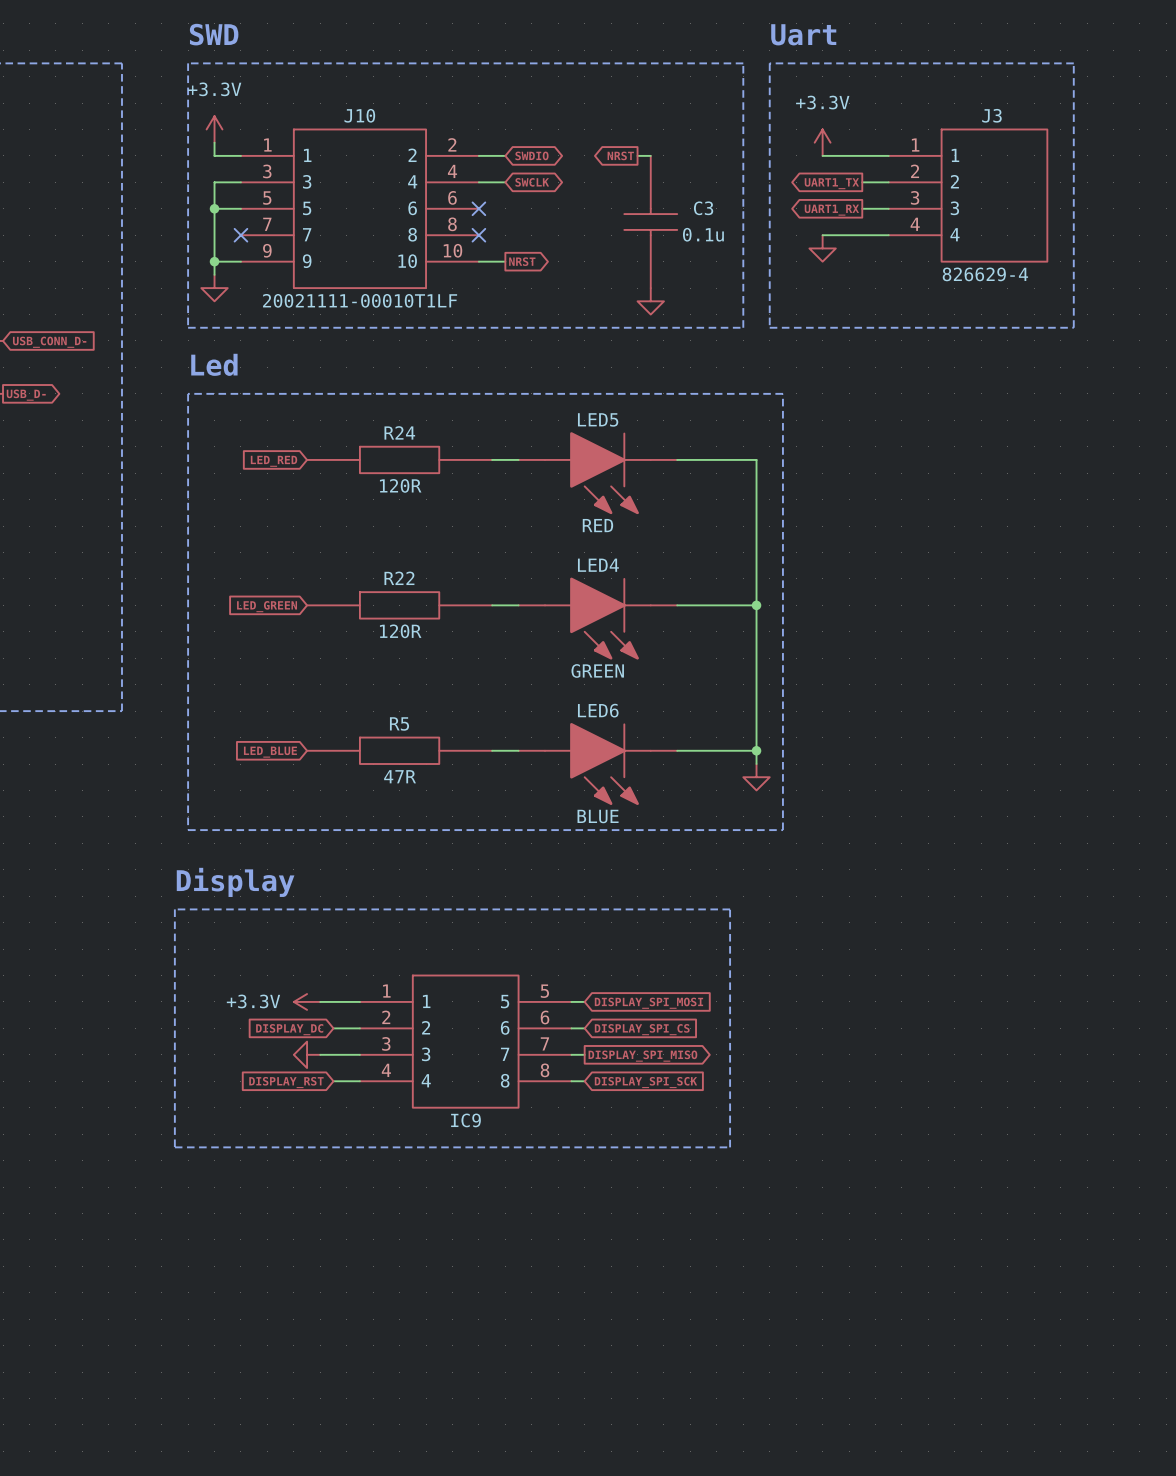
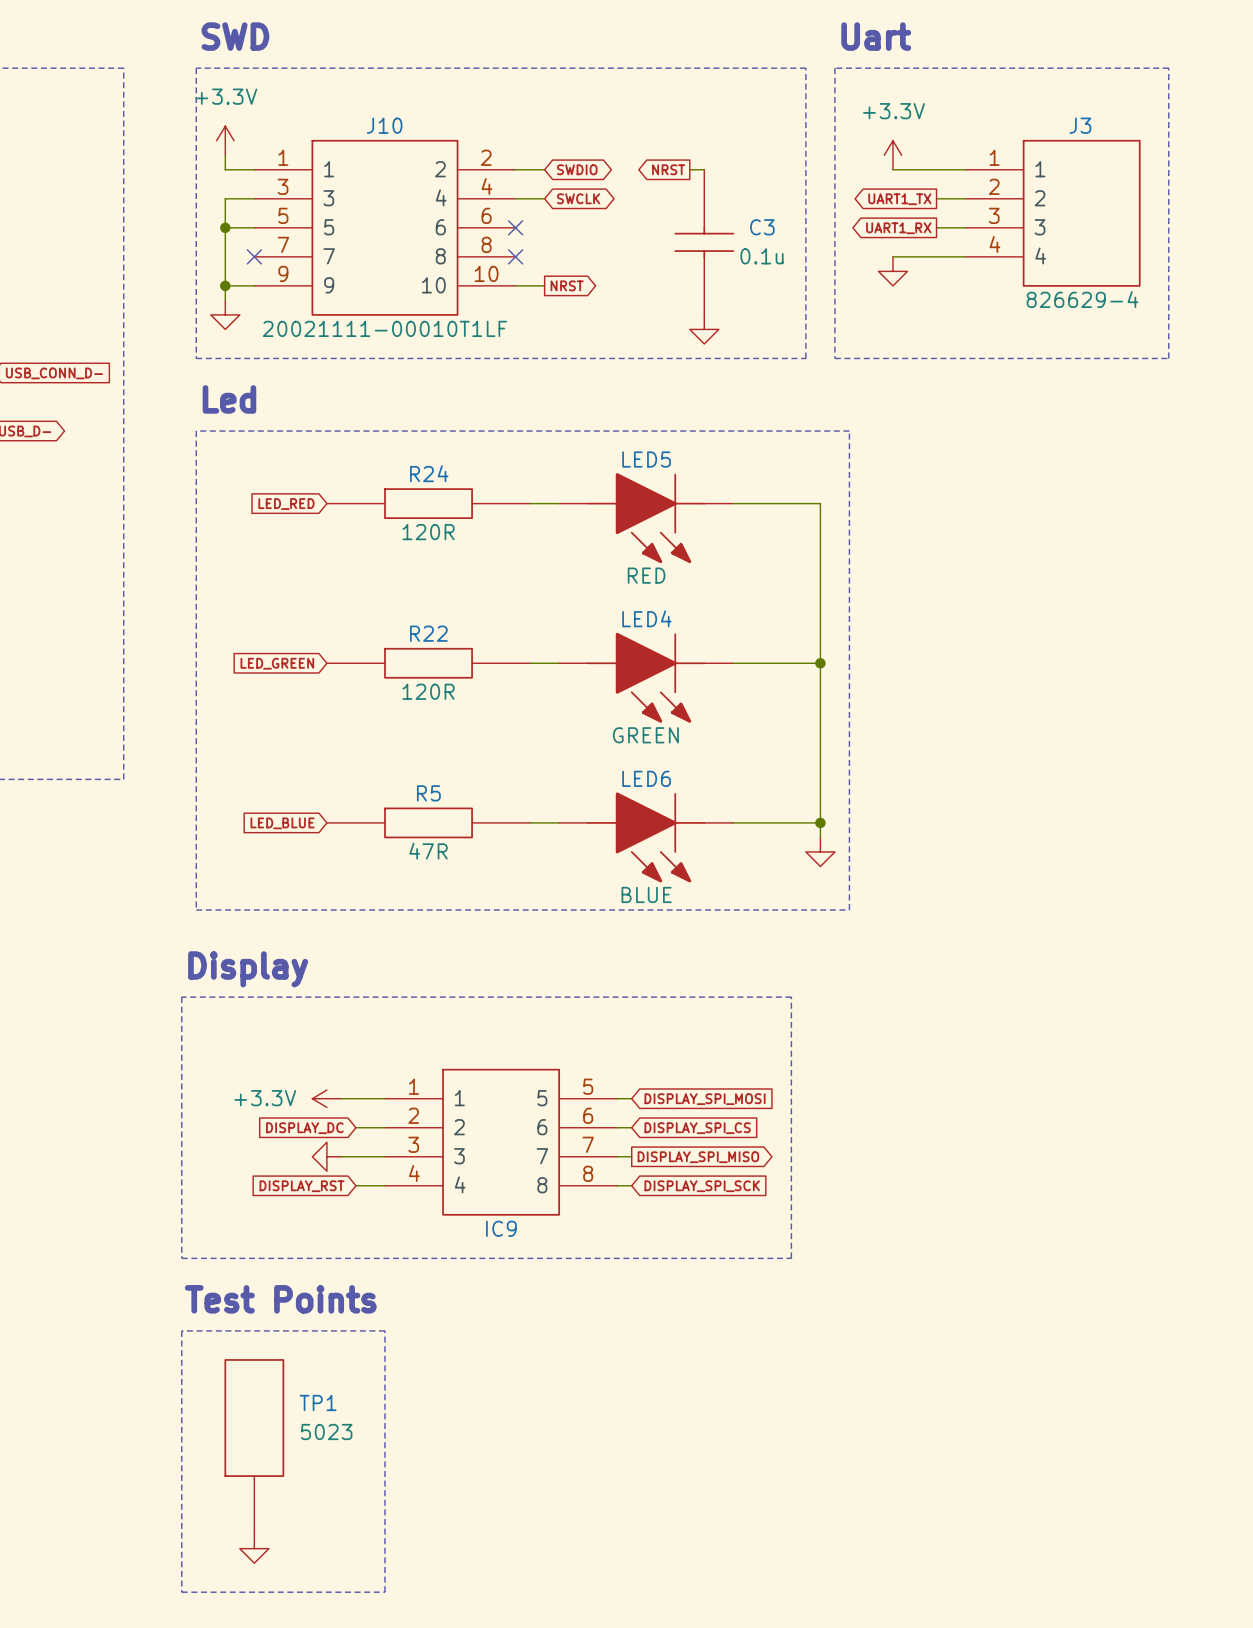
text: none -> Test Points (280, 1299)
line: none -> (181, 1330) (384, 1330) (384, 1592) (181, 1592) (181, 1330)
TP1: none -> (254, 1446)
power symbol: none -> (254, 1548)

